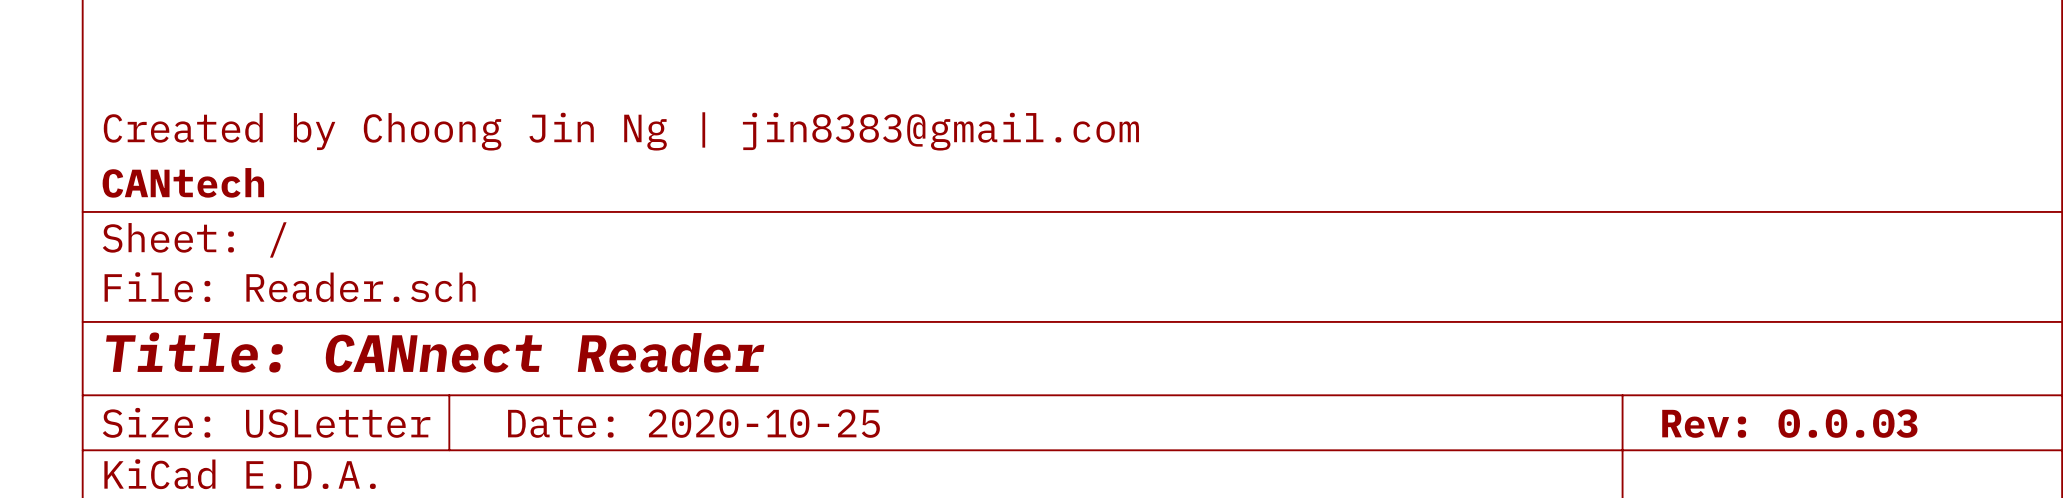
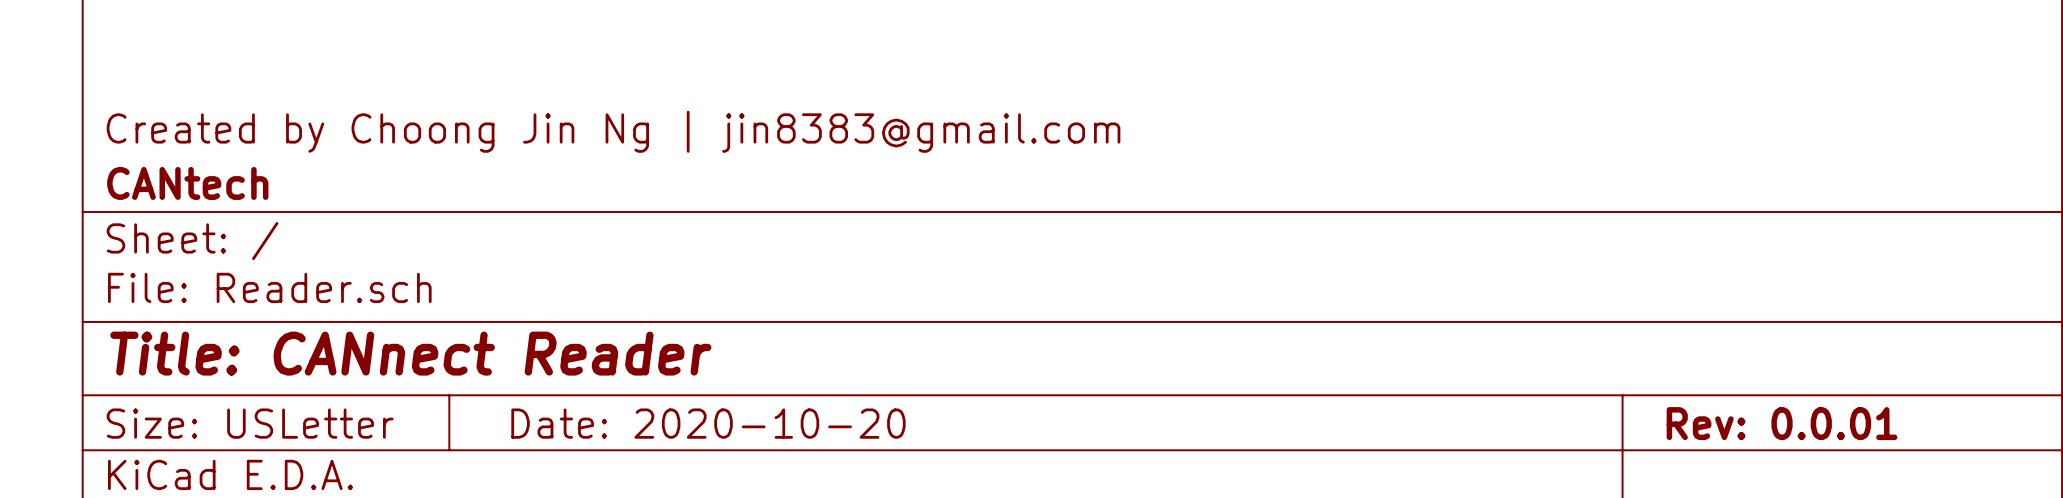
title block: Date: 2020-10-25 (693, 423) -> Date: 2020-10-20 (708, 423)
title block: Rev: 0.0.03 (1789, 423) -> Rev: 0.0.01 (1782, 423)

